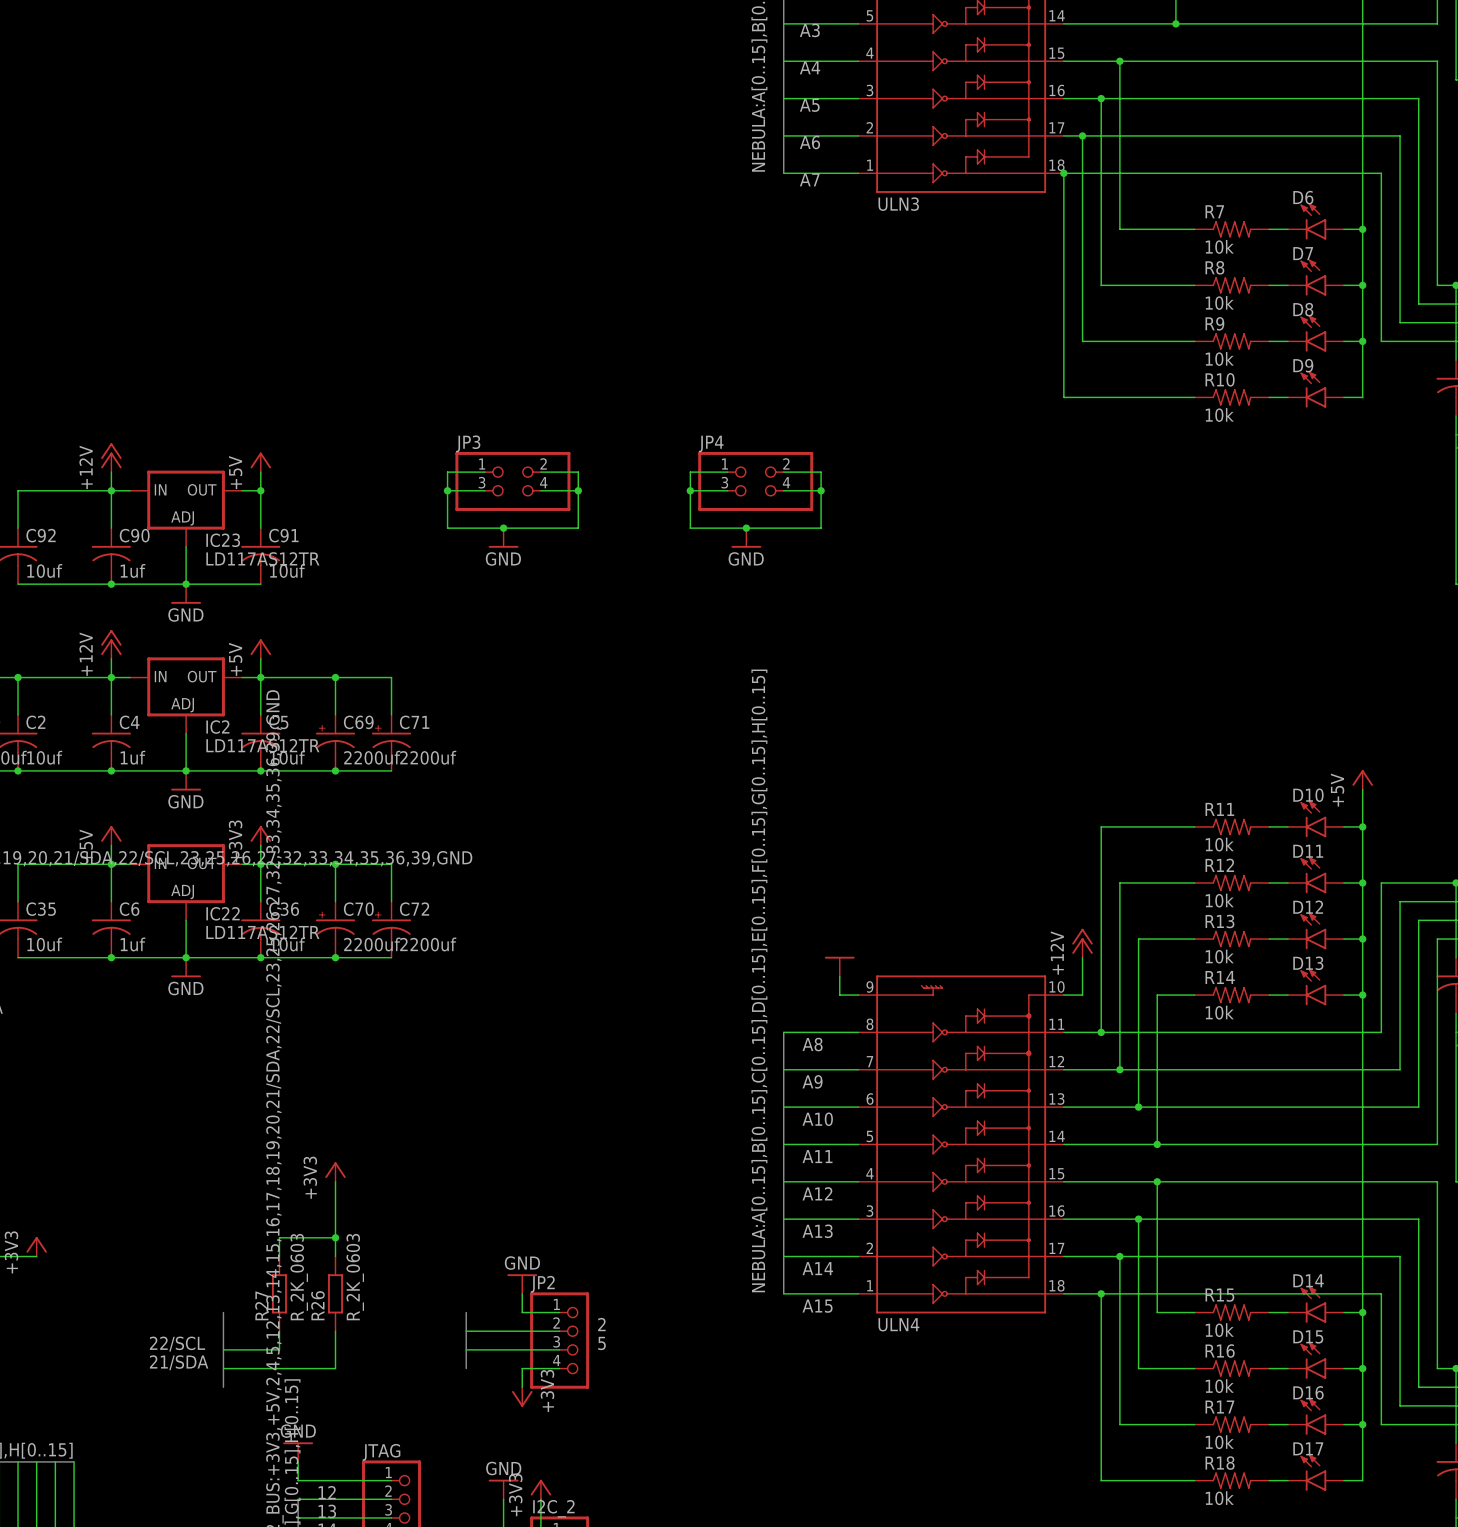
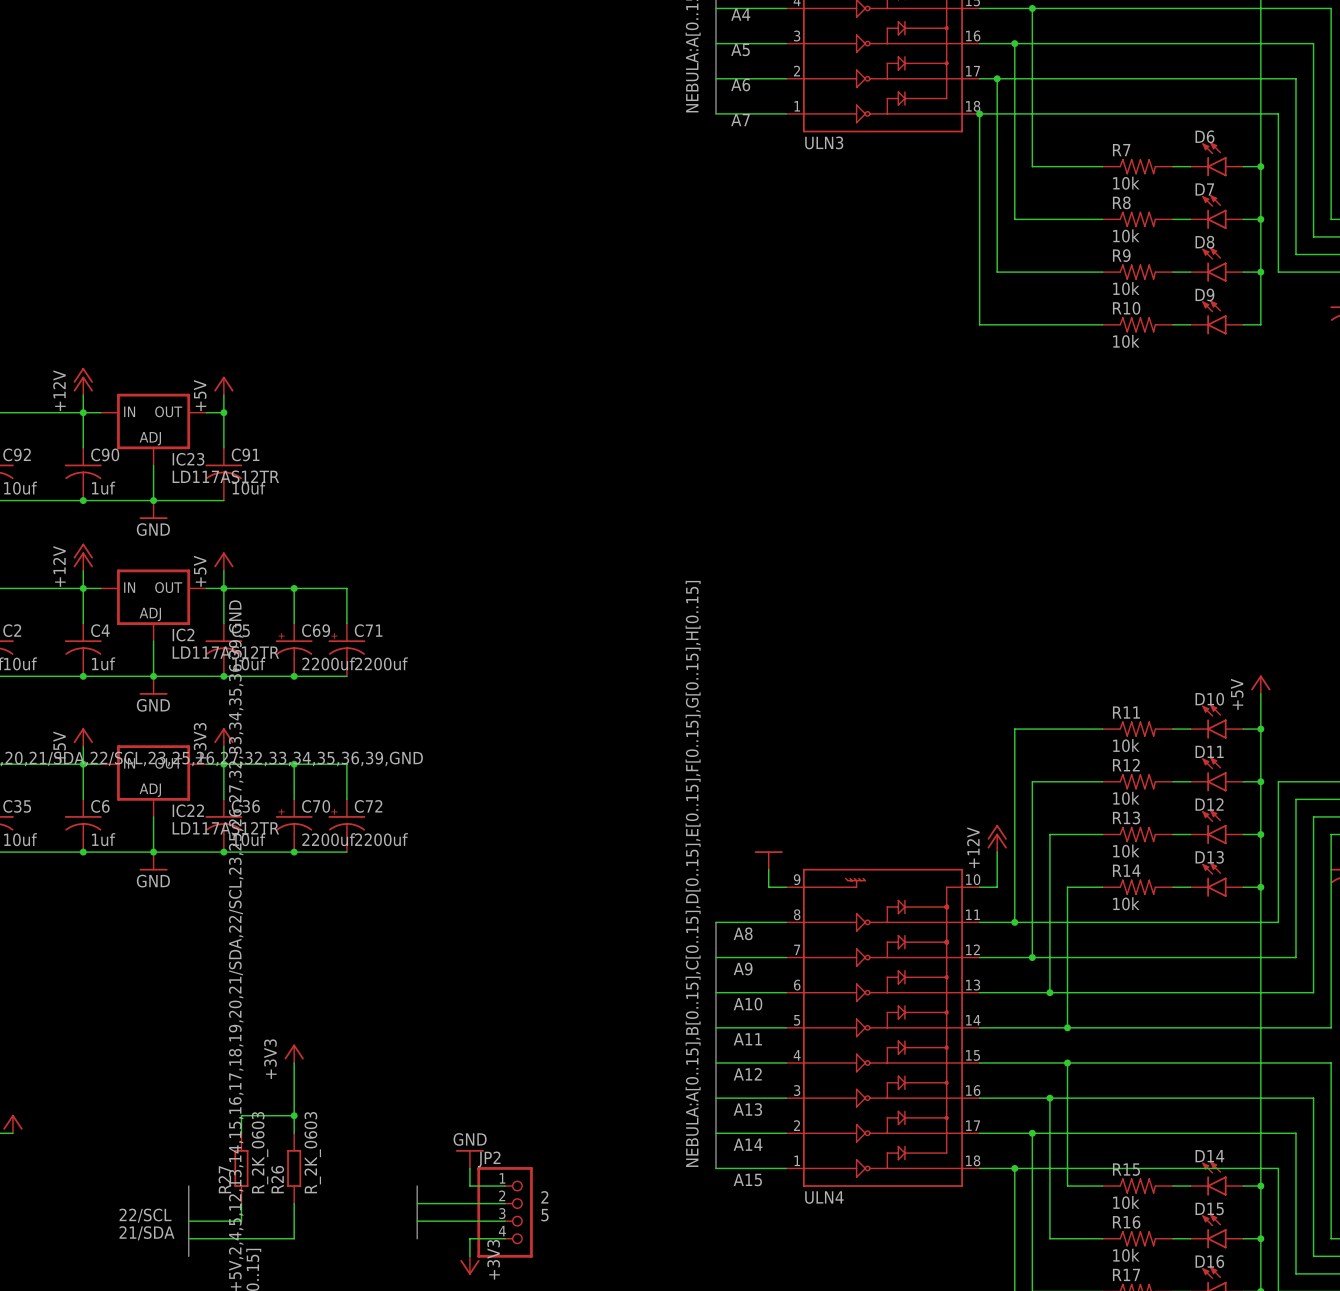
wire: (484, 472) (447, 472) (447, 528) (578, 528) (578, 472) (540, 472) -> none
wire: (727, 472) (690, 472) (690, 528) (821, 528) (821, 472) (783, 472) -> none
JP3: (512, 481) -> none
JP4: (755, 481) -> none
wire: (447, 490) (484, 490) -> none
junction: (447, 490) -> none
wire: (540, 490) (578, 490) -> none
junction: (578, 490) -> none
wire: (690, 490) (727, 490) -> none
junction: (690, 490) -> none
wire: (783, 490) (821, 490) -> none
junction: (821, 490) -> none
junction: (503, 528) -> none
junction: (746, 528) -> none
power symbol: GND (503, 537) -> none
power symbol: GND (746, 537) -> none

